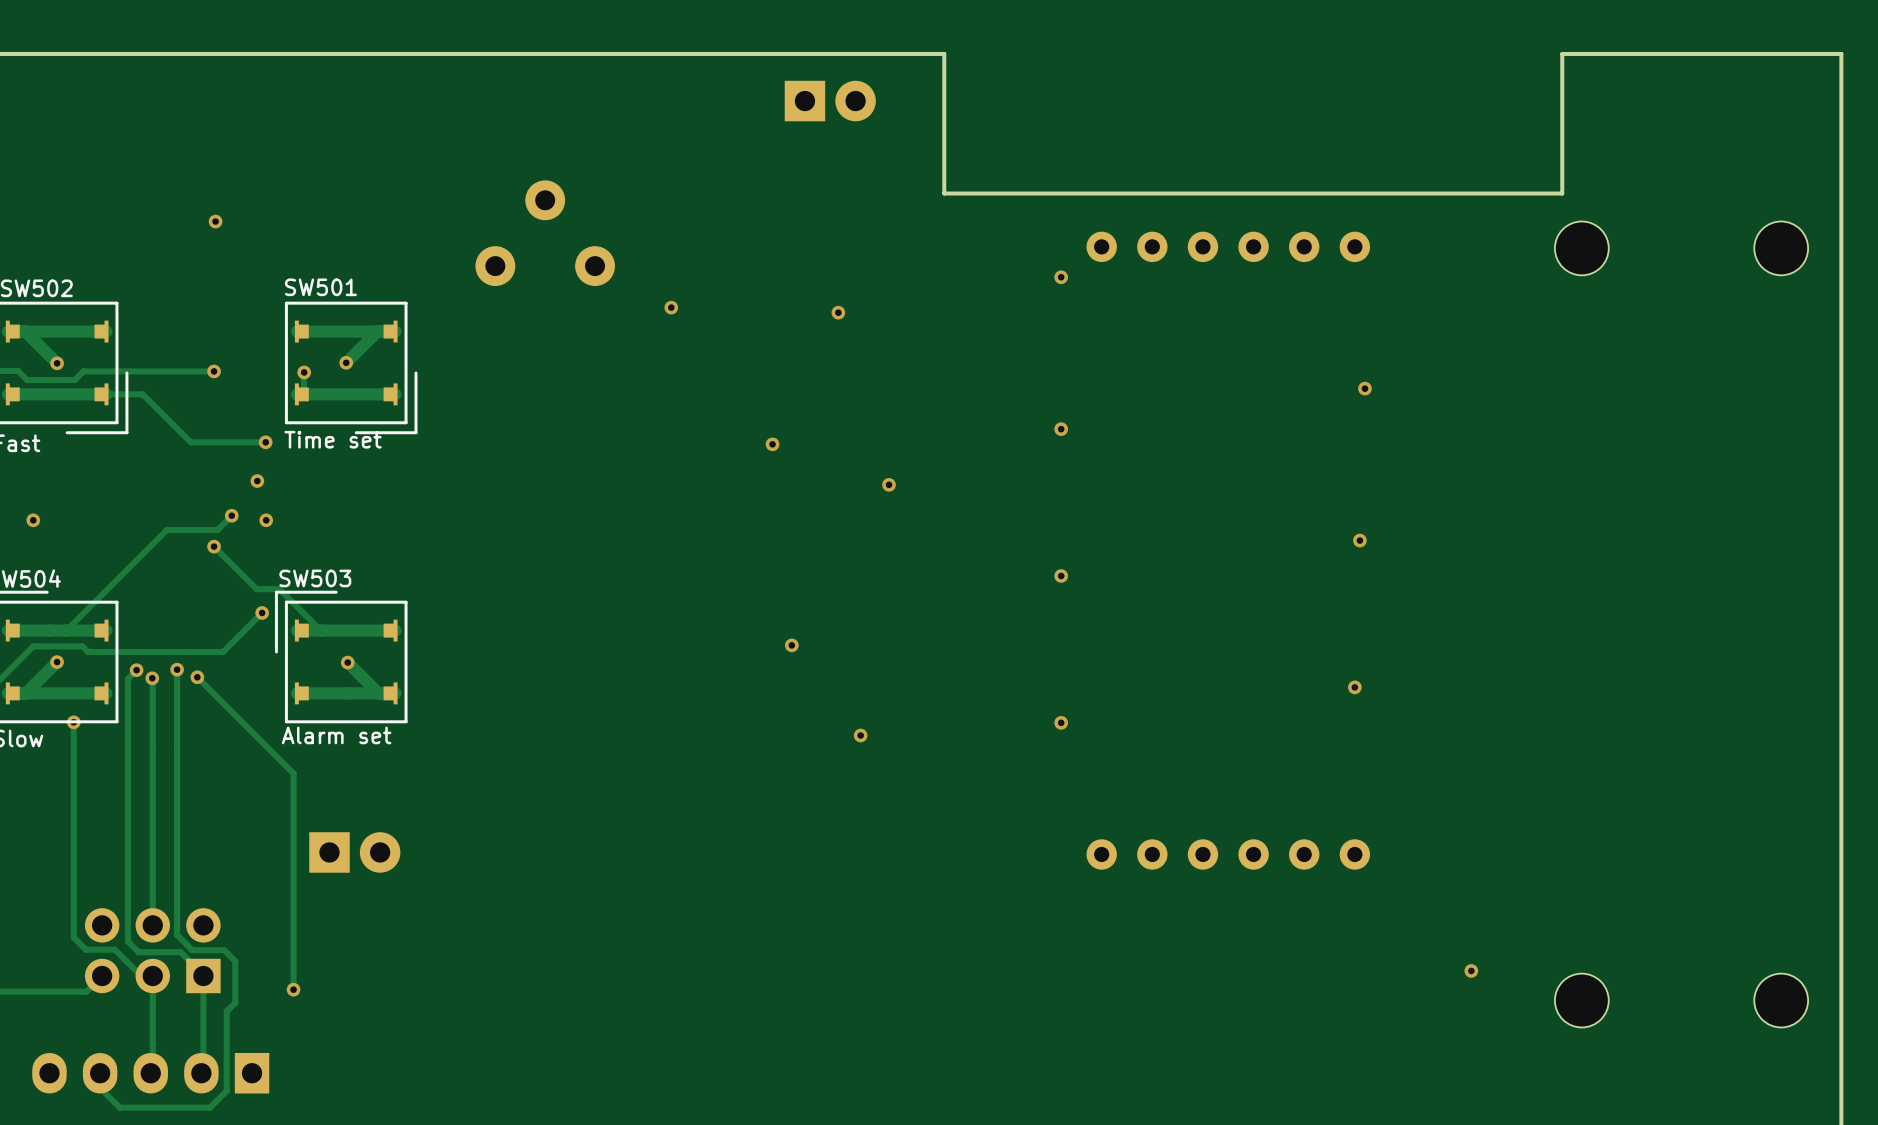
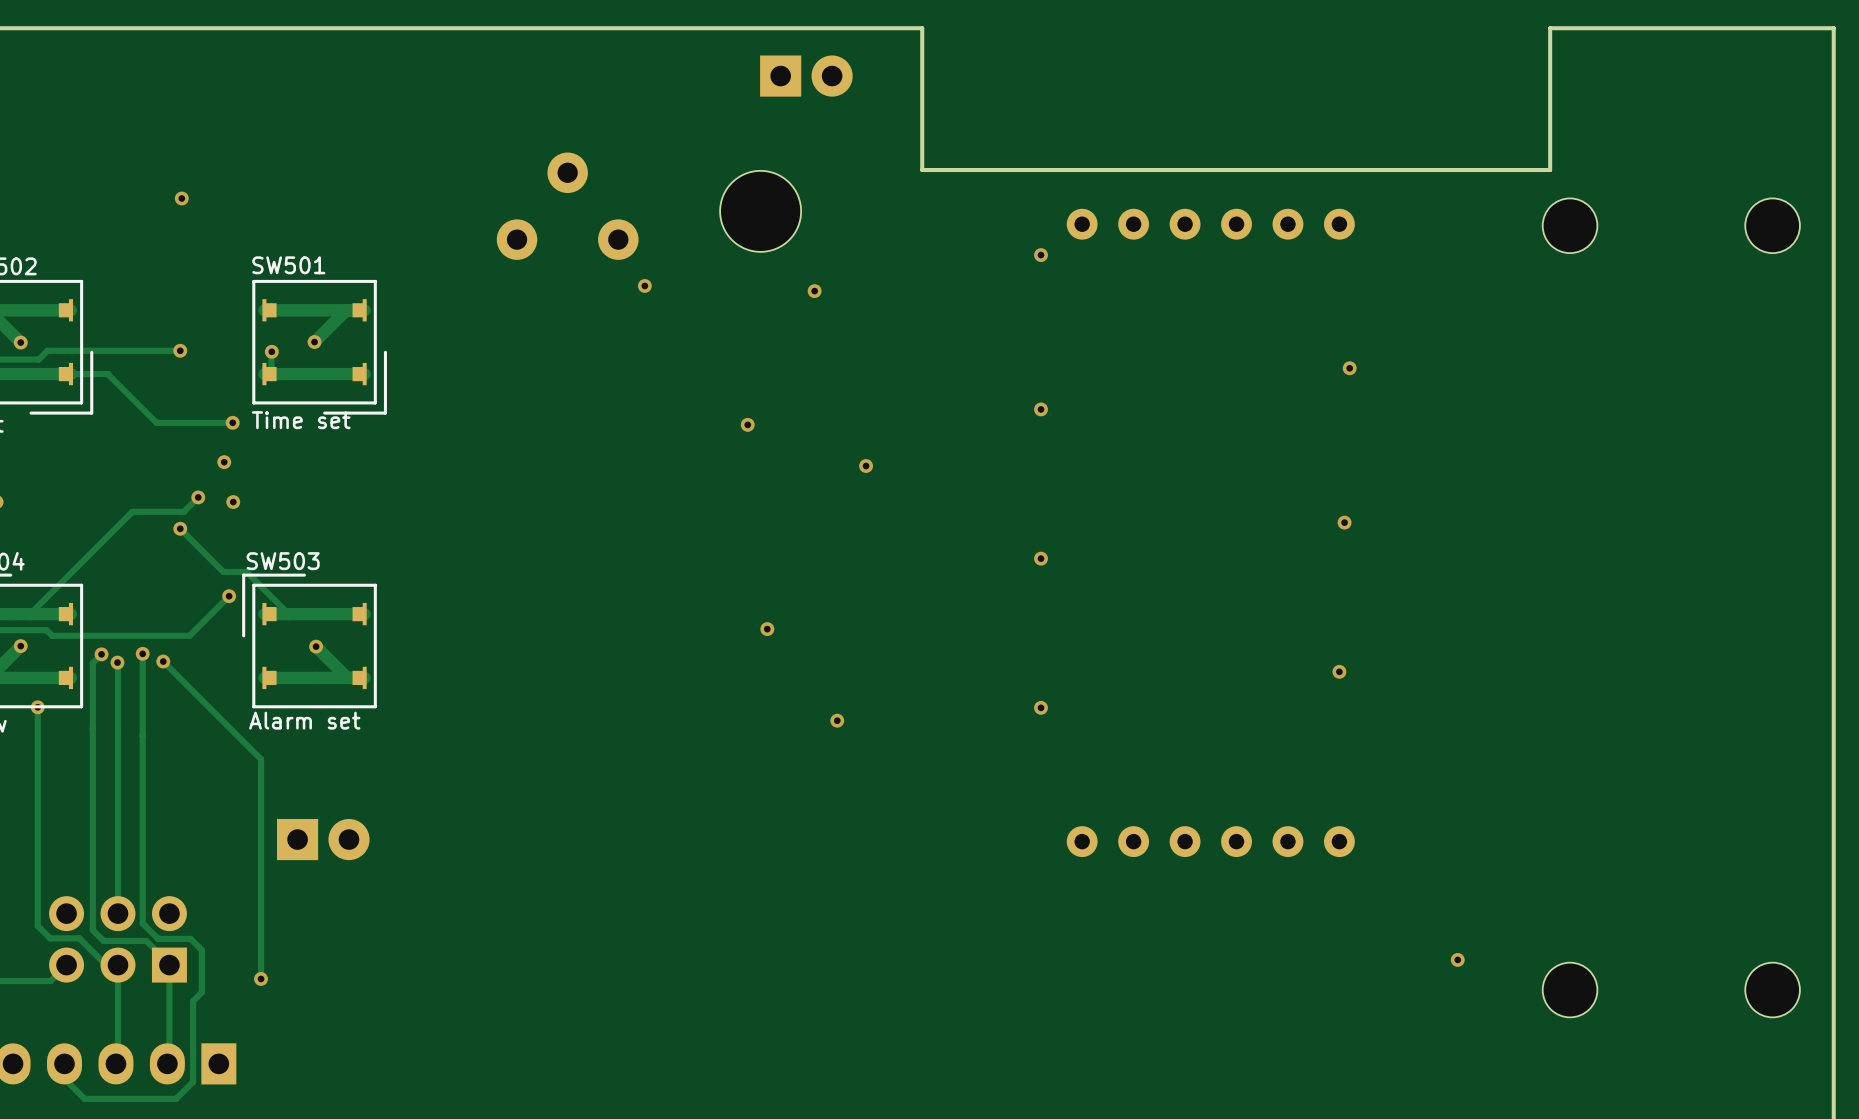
part position: (545, 233) -> (567, 206)
part: none -> (760, 211)

